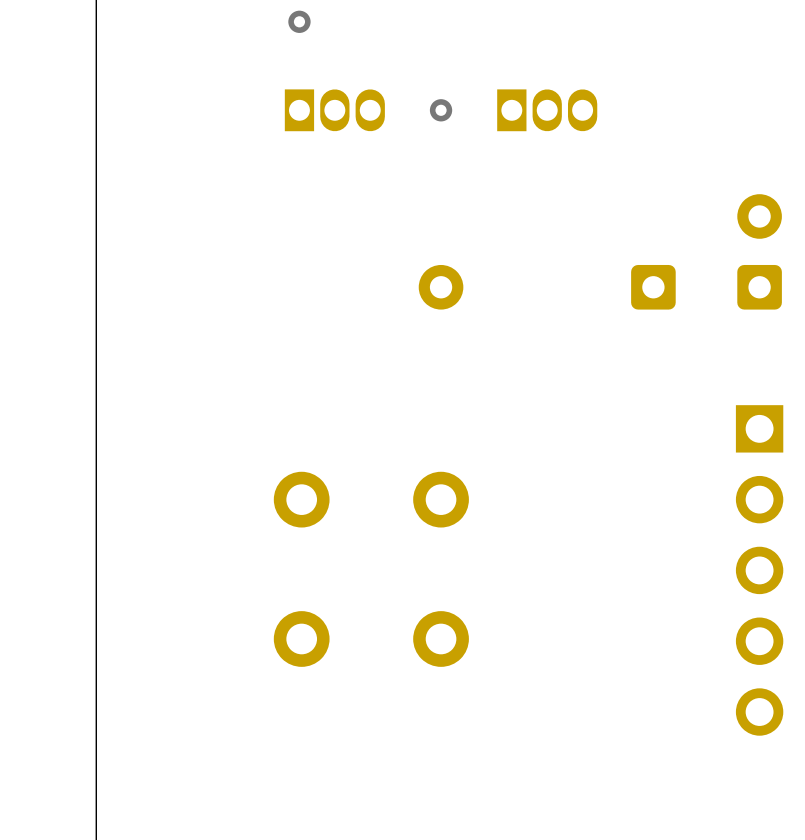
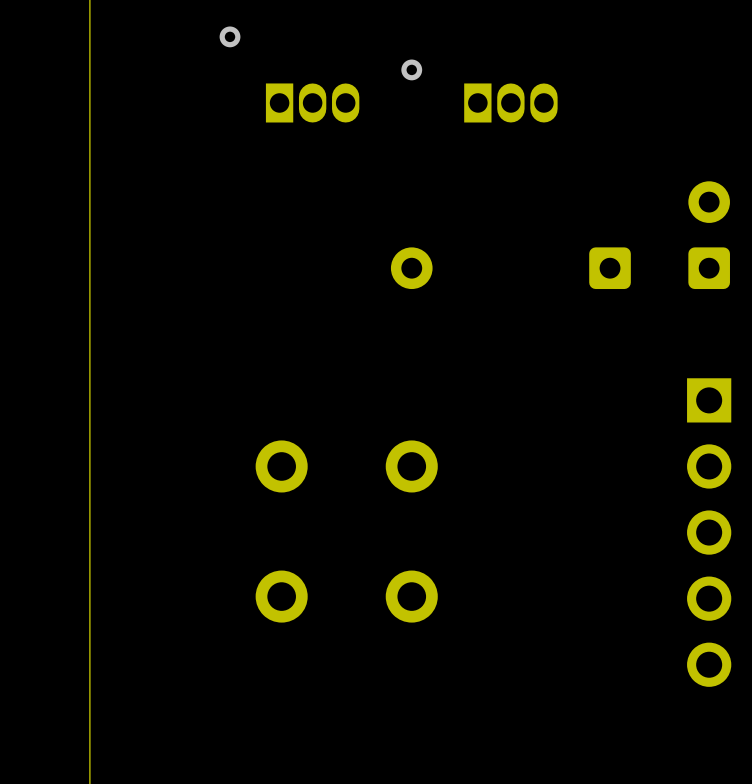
via position: (299, 21) -> (230, 36)
via position: (441, 110) -> (411, 69)

